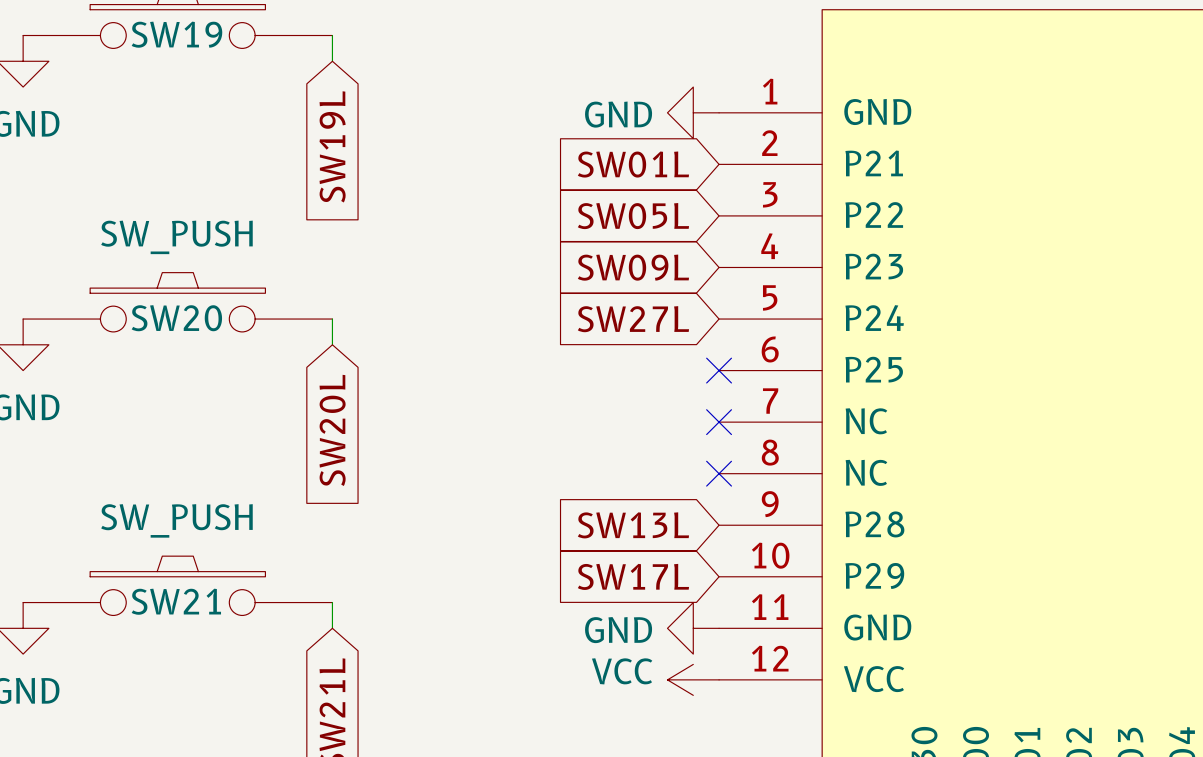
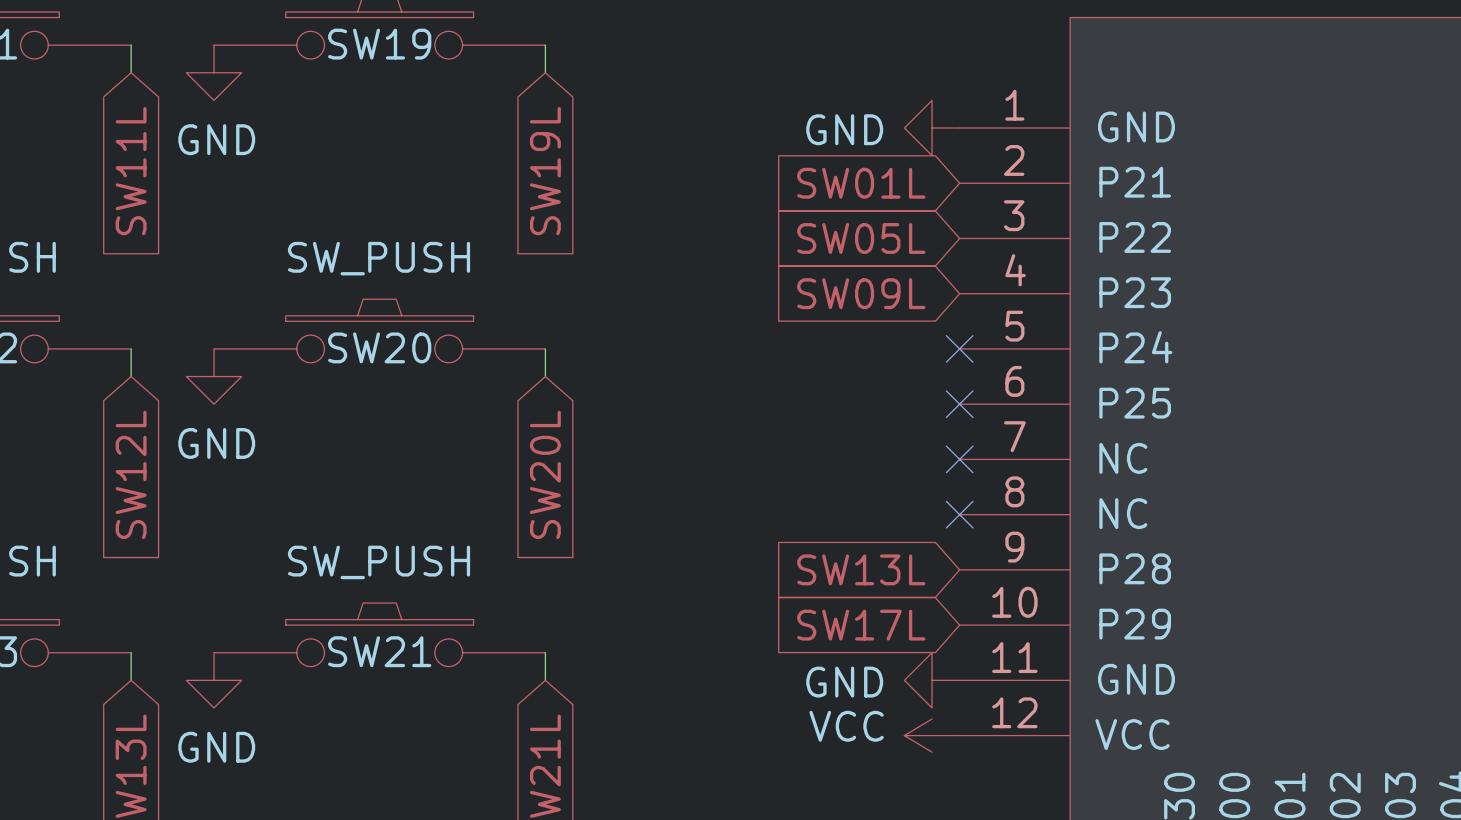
global label: SW27L (633, 319) -> none
no-connect mark: none -> (959, 348)

